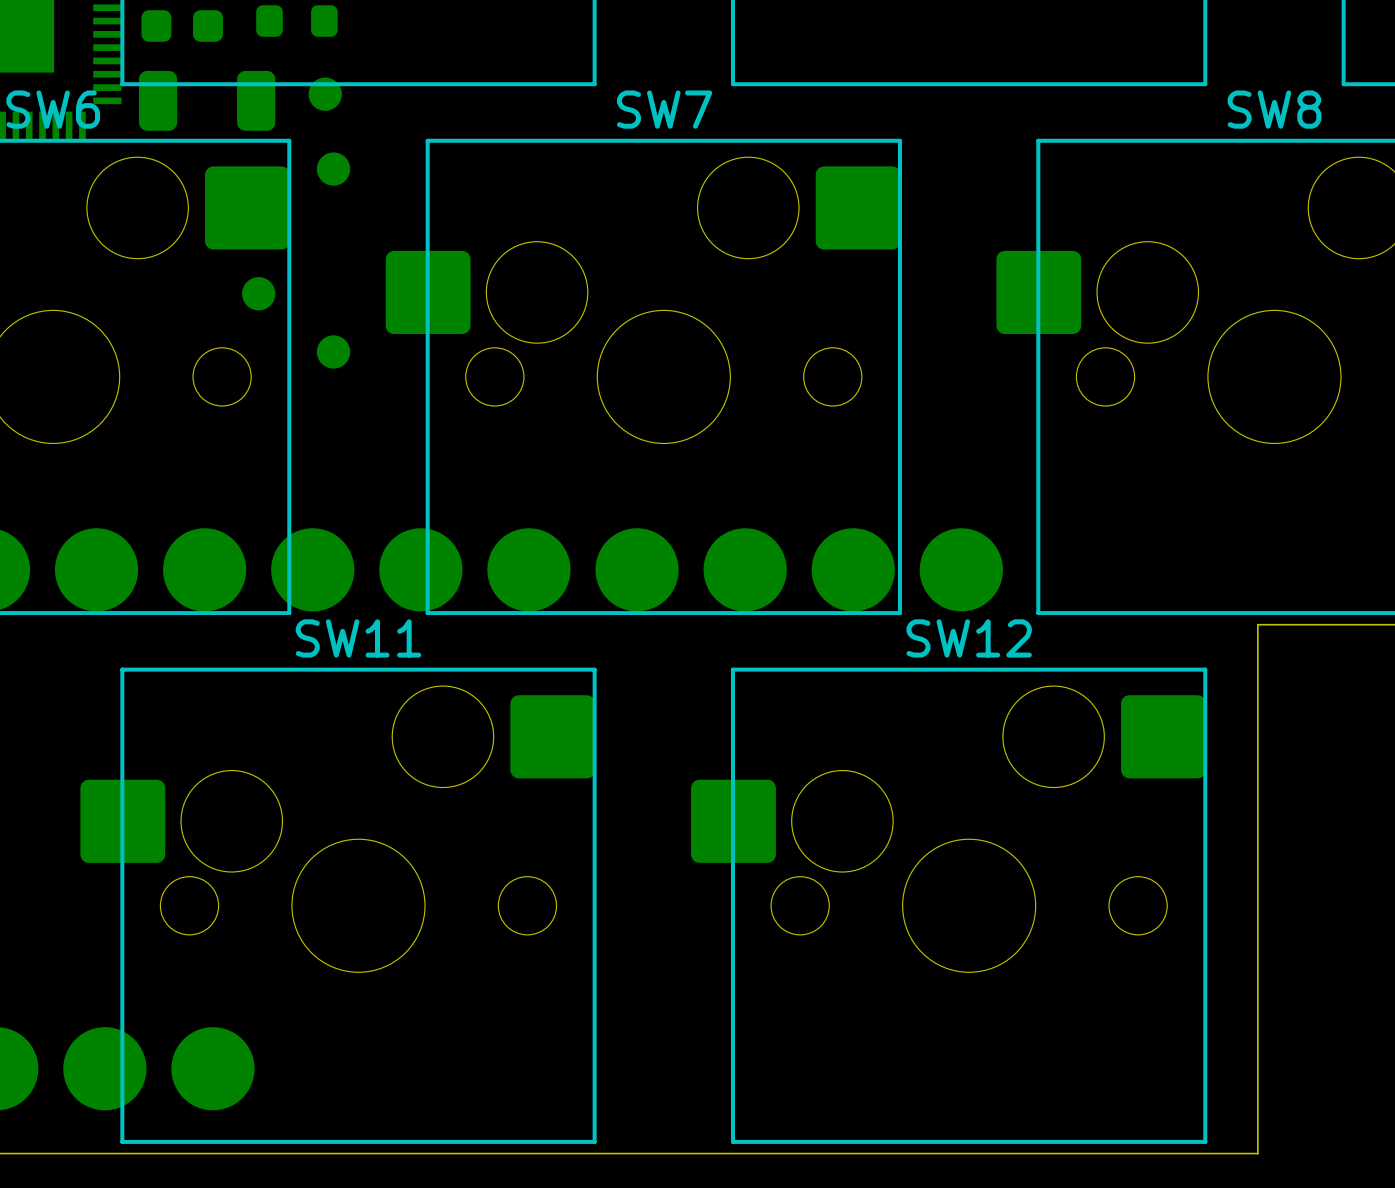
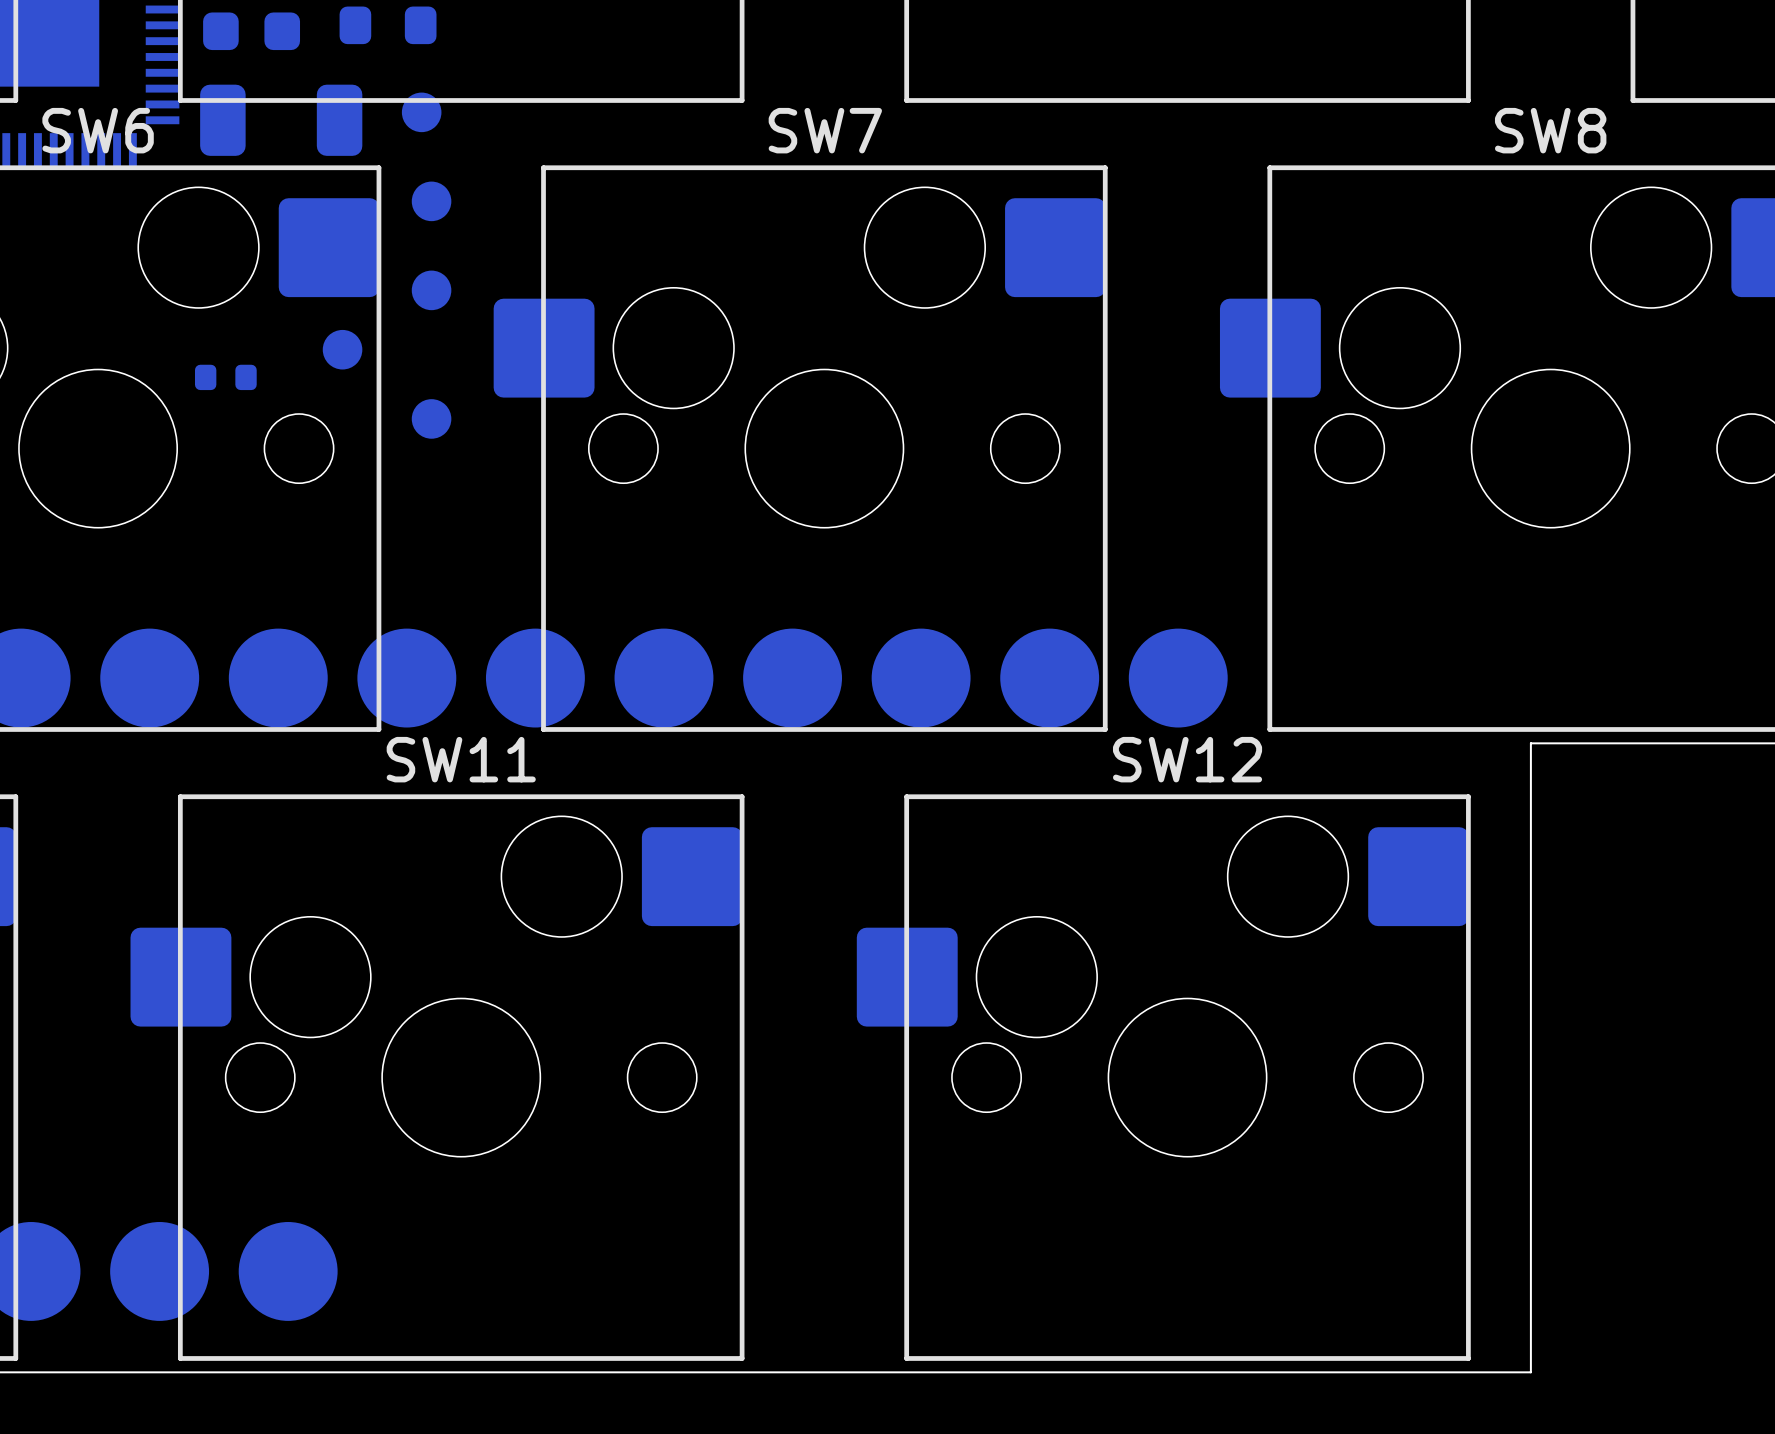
part: none -> (431, 290)
part: none -> (225, 377)

